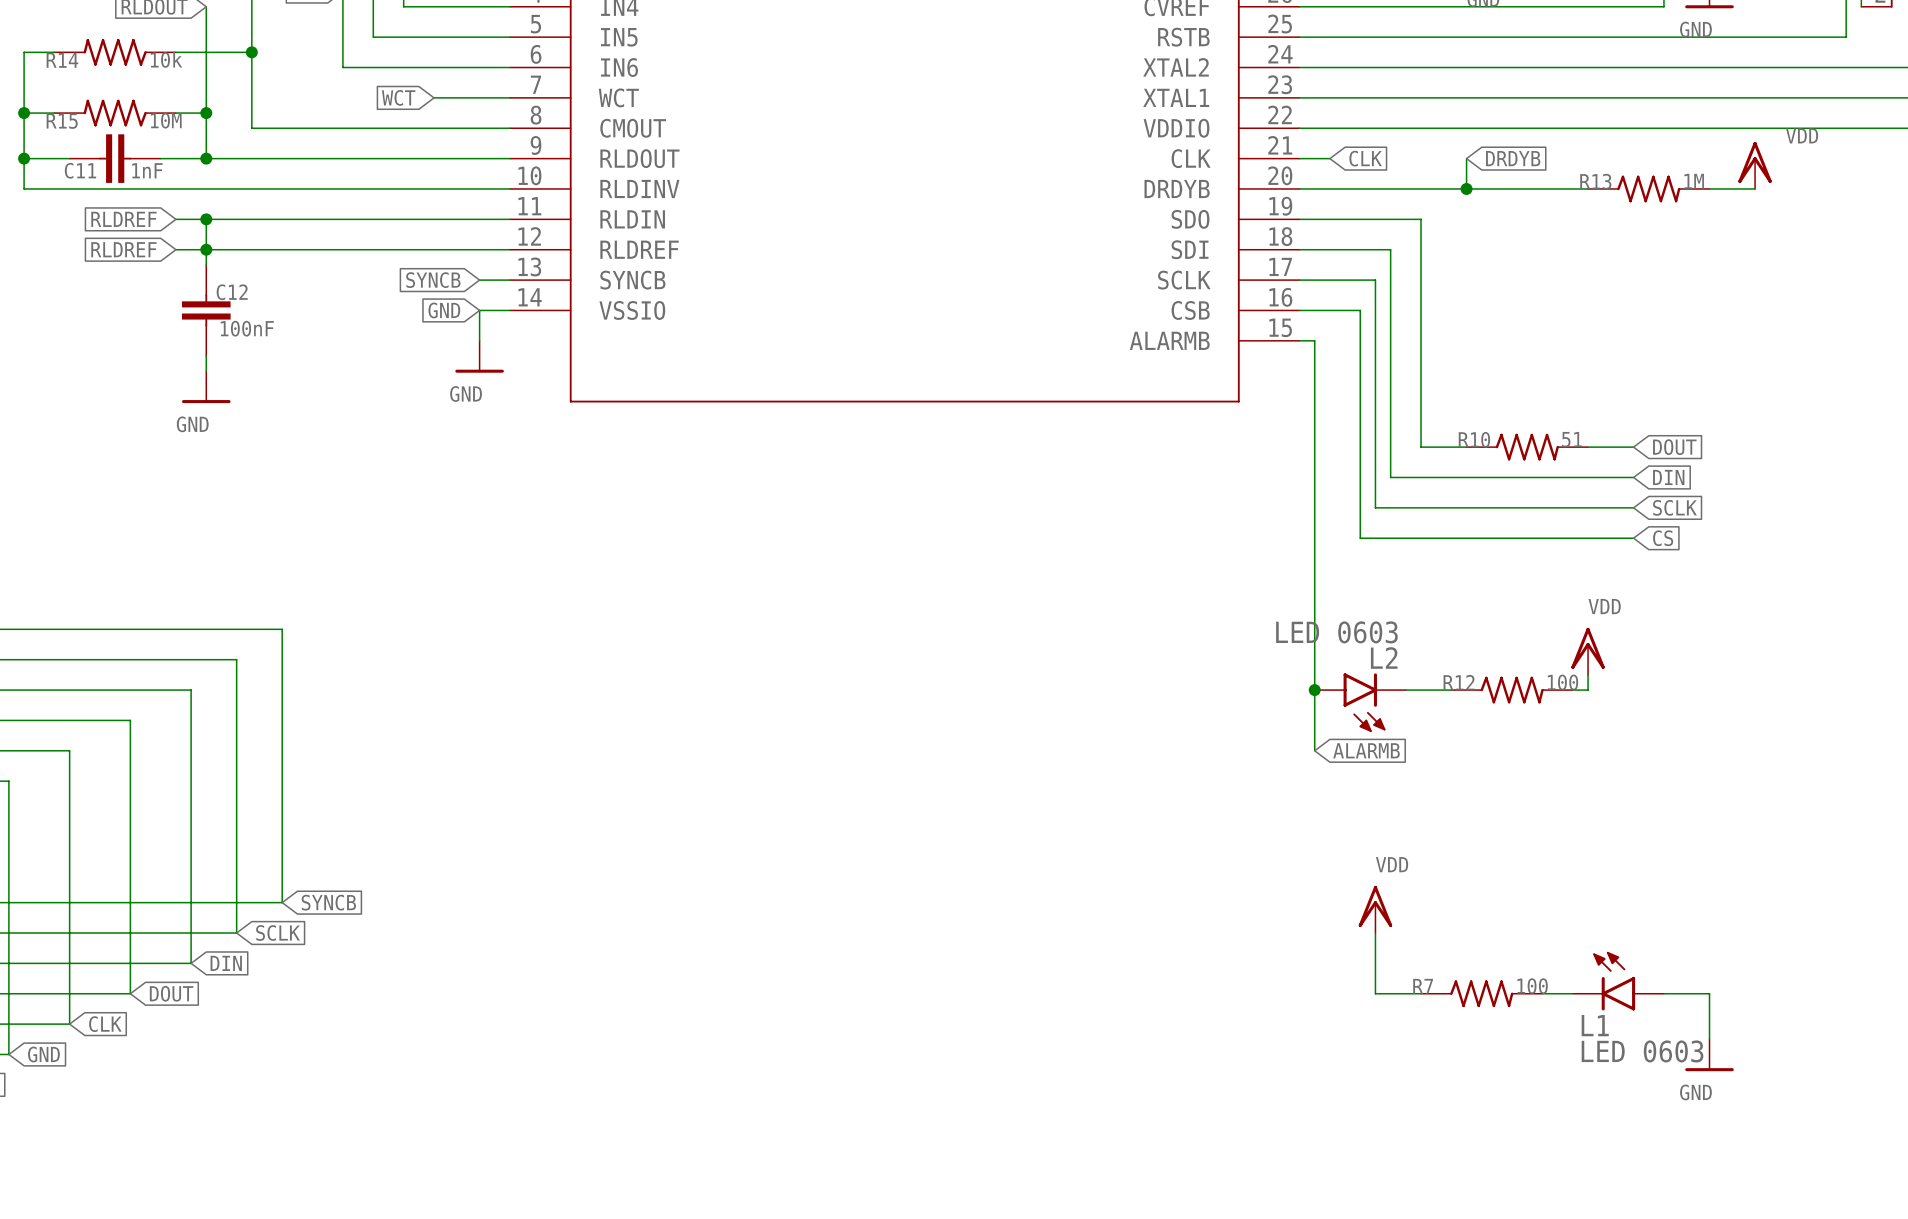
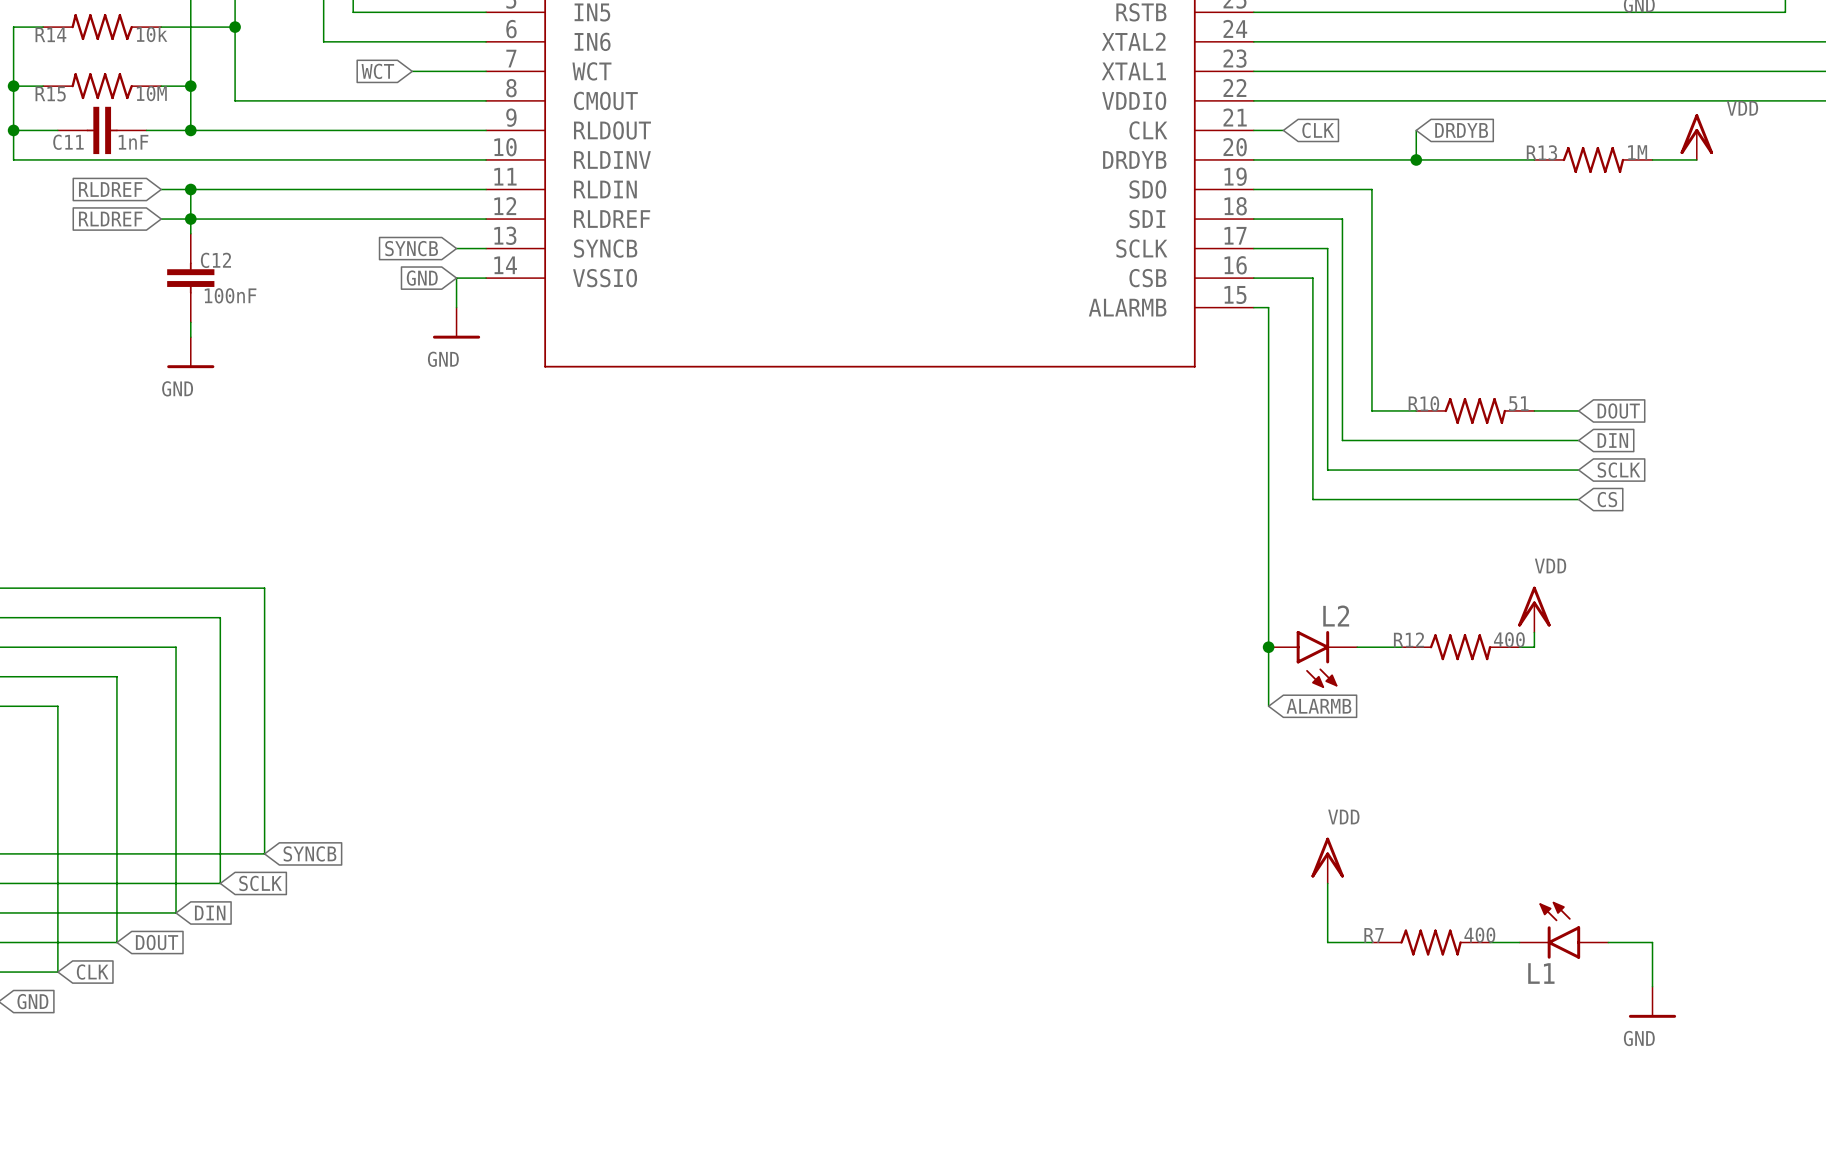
L2 value: LED 0603 (1336, 632) -> none
R12 value: 100 (1562, 682) -> 400 (1509, 639)
R7 value: 100 (1532, 986) -> 400 (1479, 935)
L1 value: LED 0603 (1642, 1051) -> none

